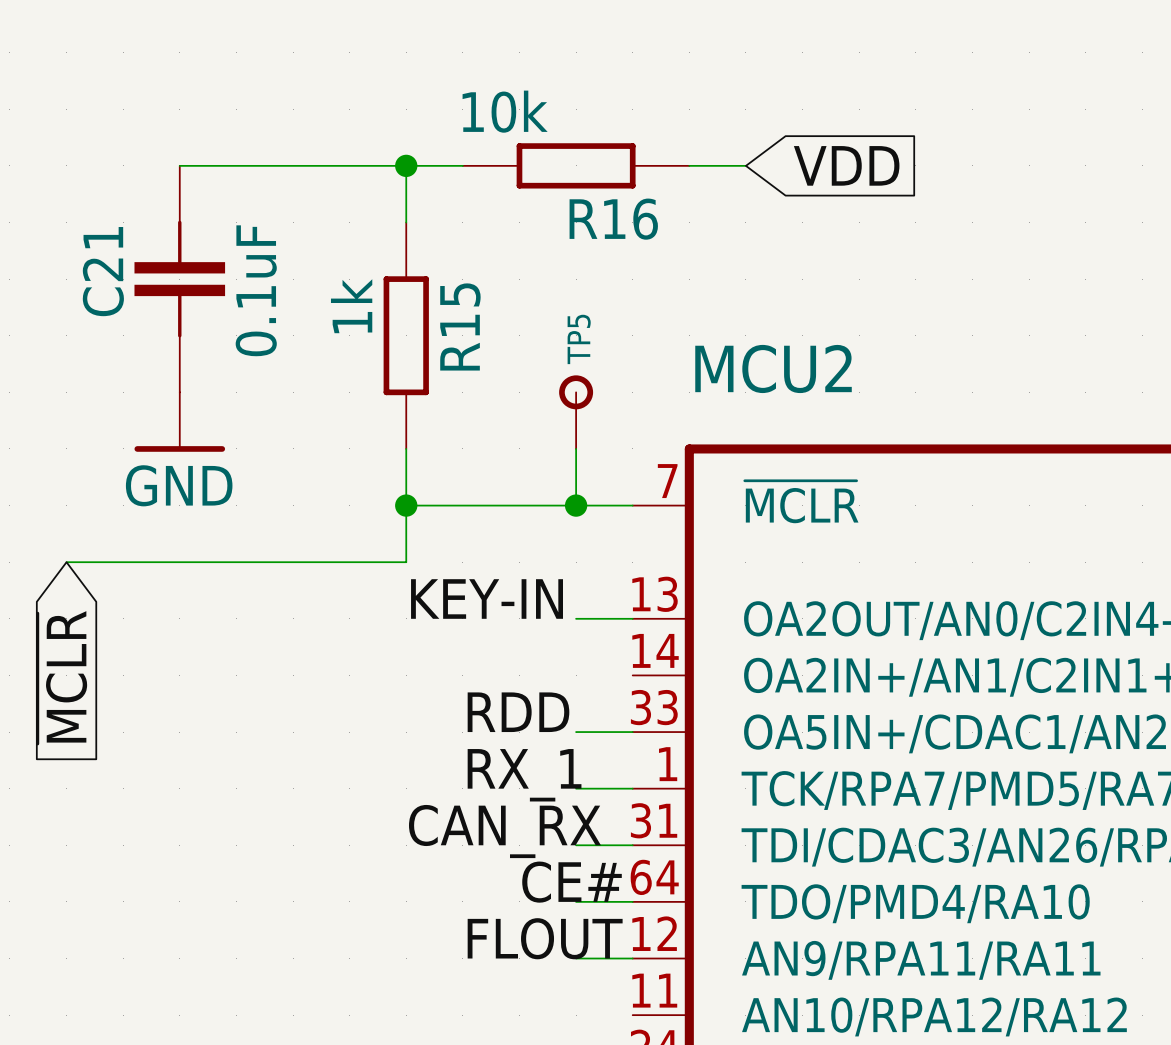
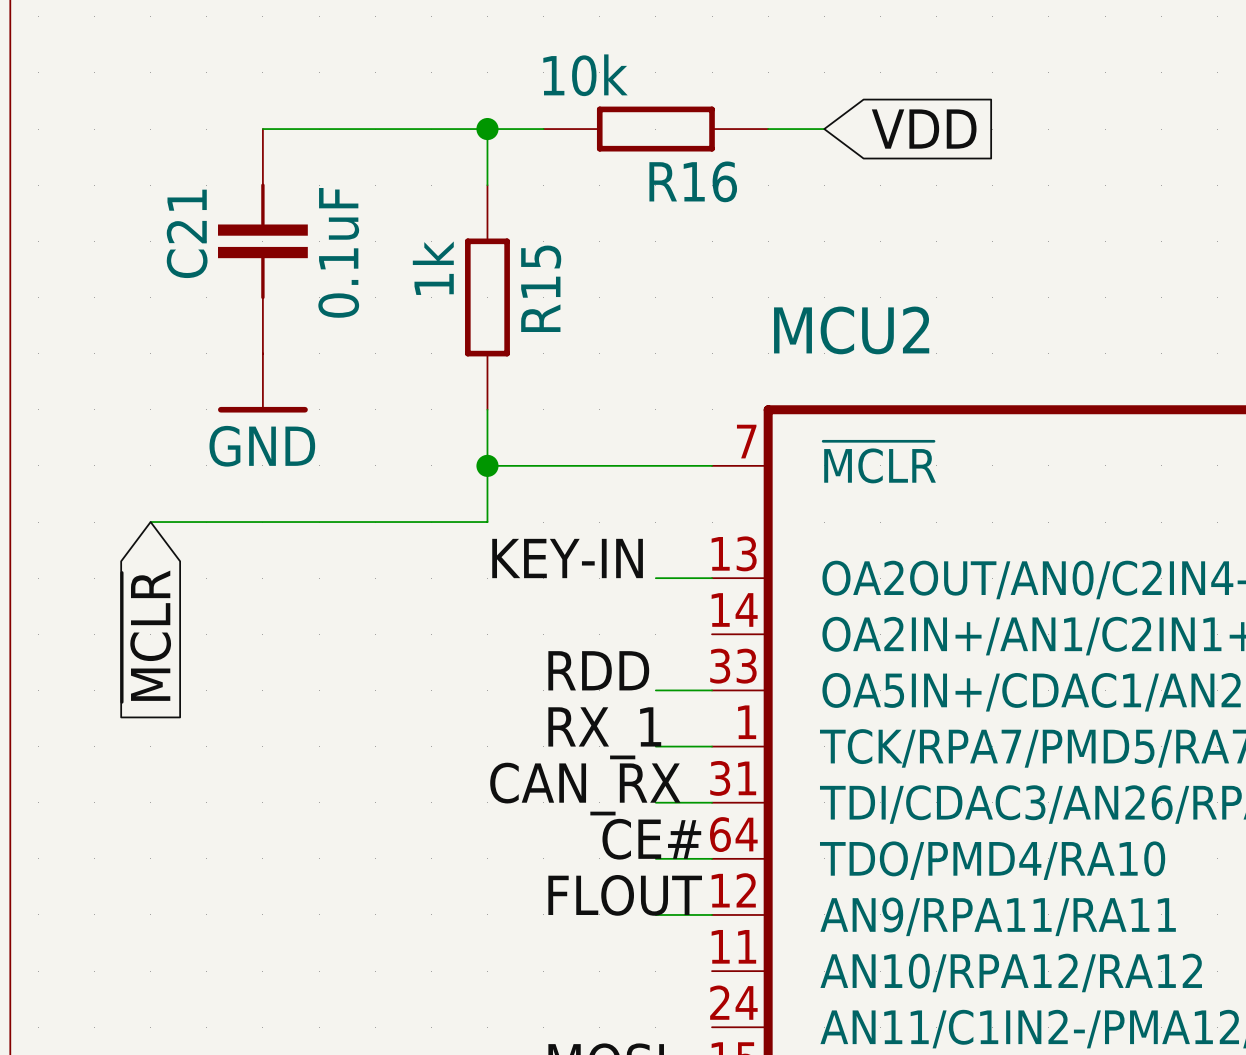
TP5: (576, 412) -> none
wire: (576, 448) (576, 505) -> none
junction: (576, 505) -> none

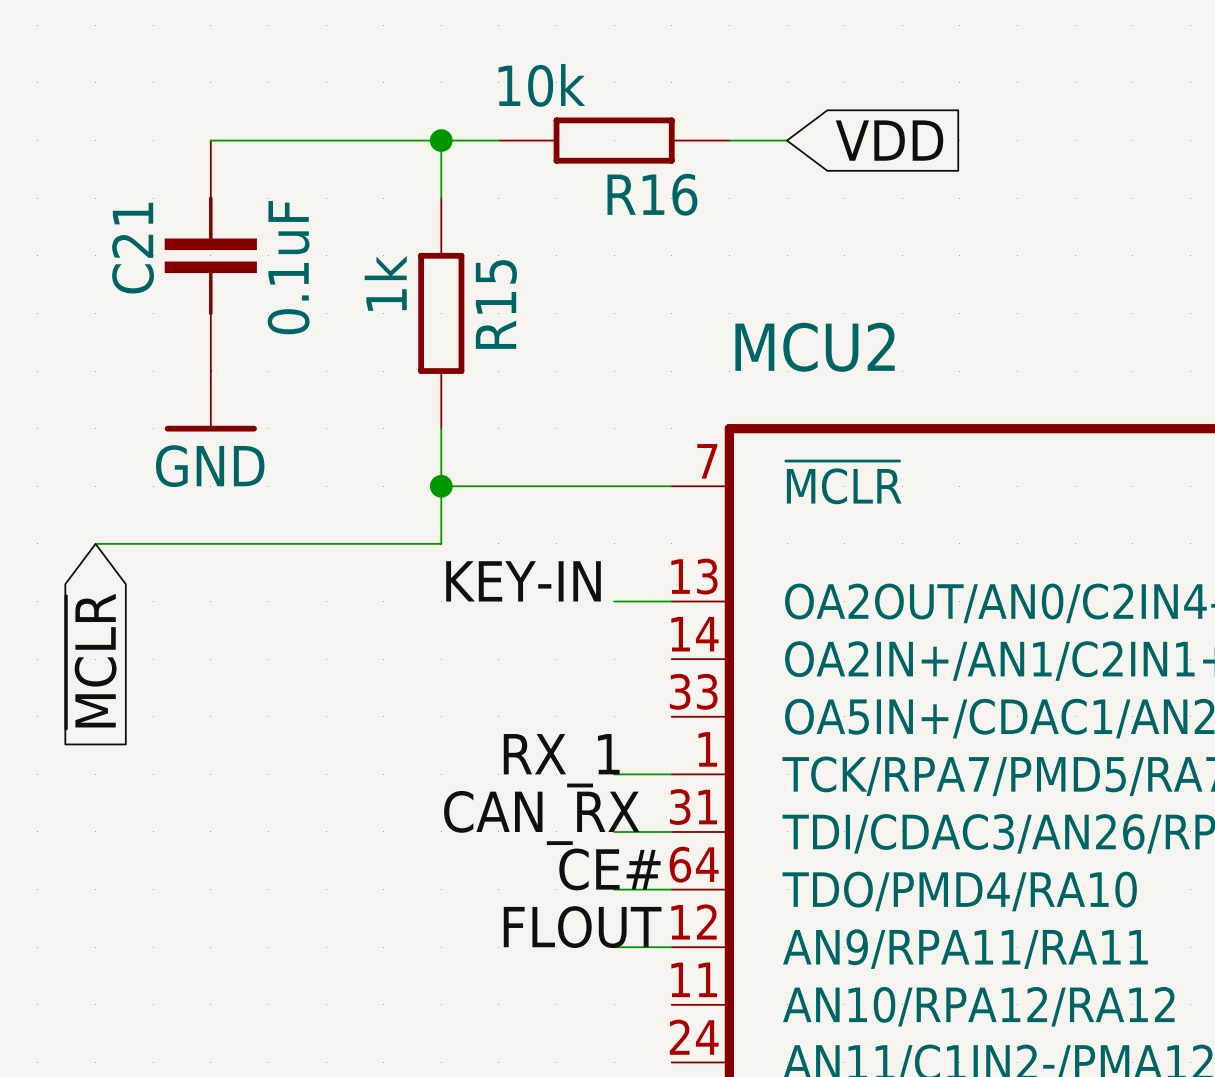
label: RDD (598, 670) -> none
wire: (655, 690) (712, 690) -> none

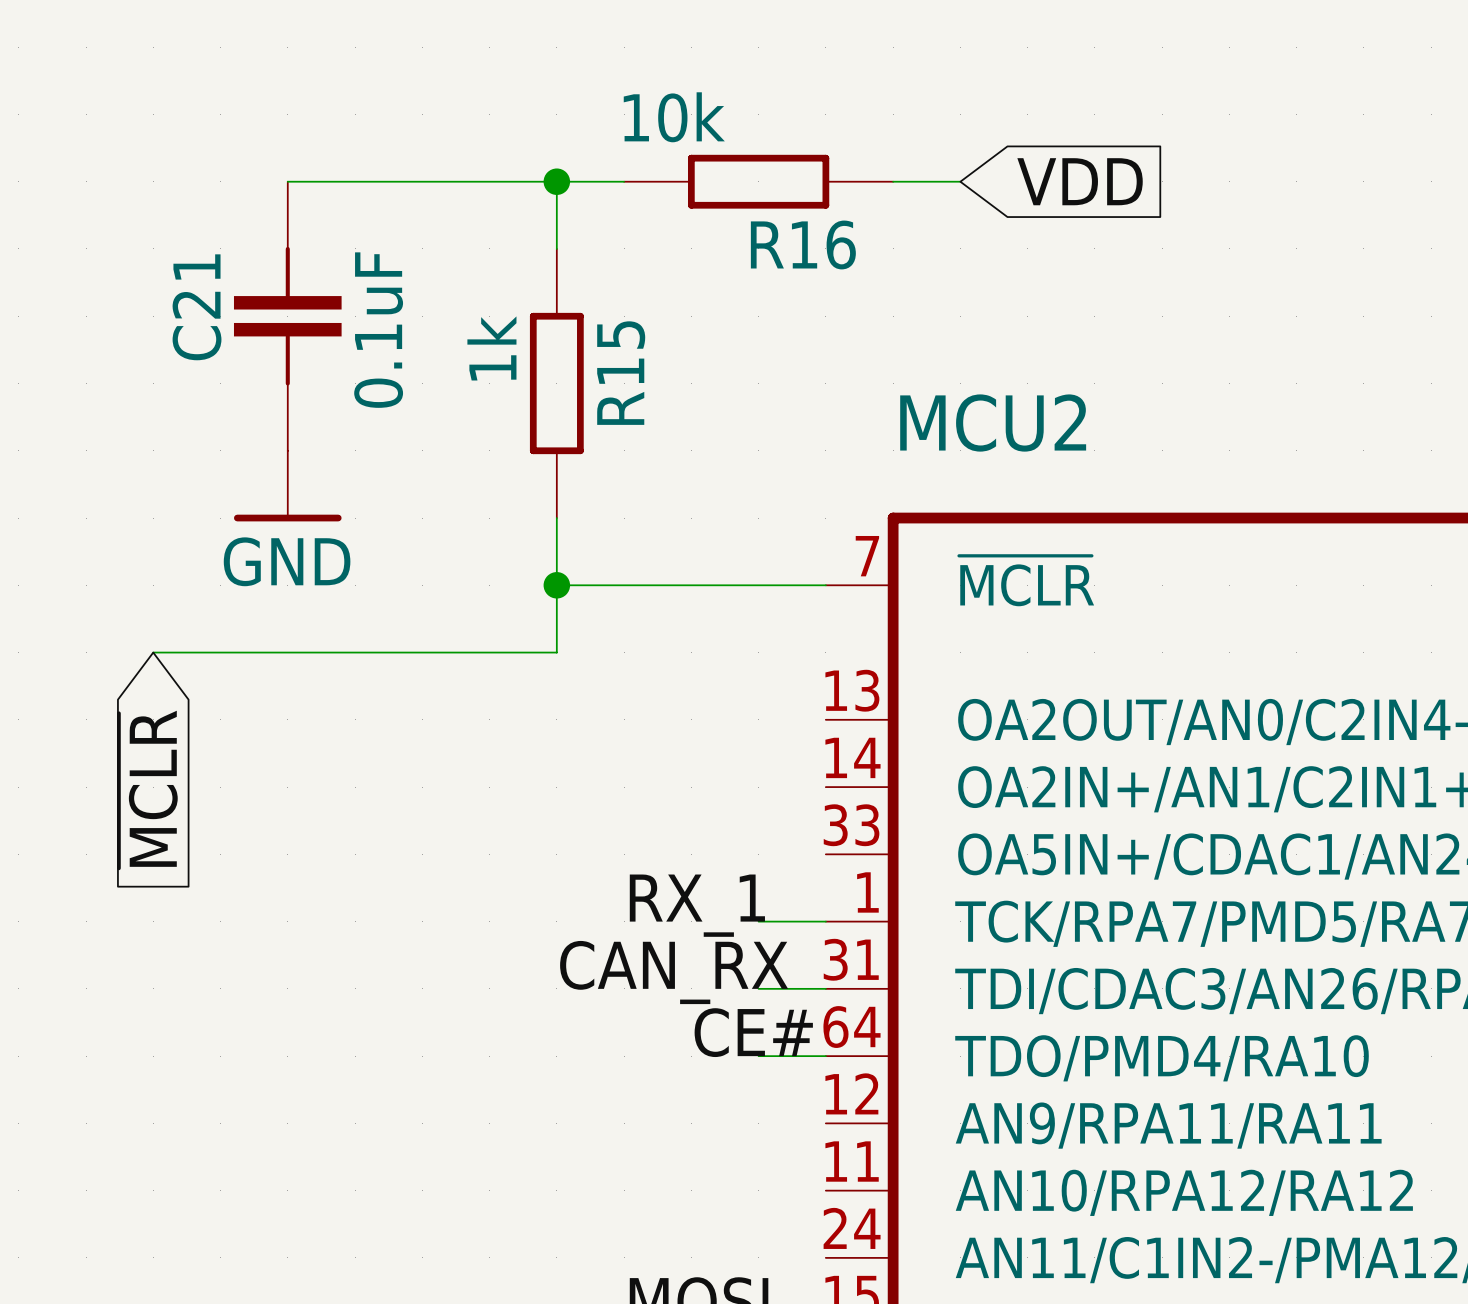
label: KEY-IN (523, 581) -> none
wire: (614, 601) (671, 601) -> none
label: FLOUT (582, 927) -> none
wire: (614, 947) (671, 947) -> none

